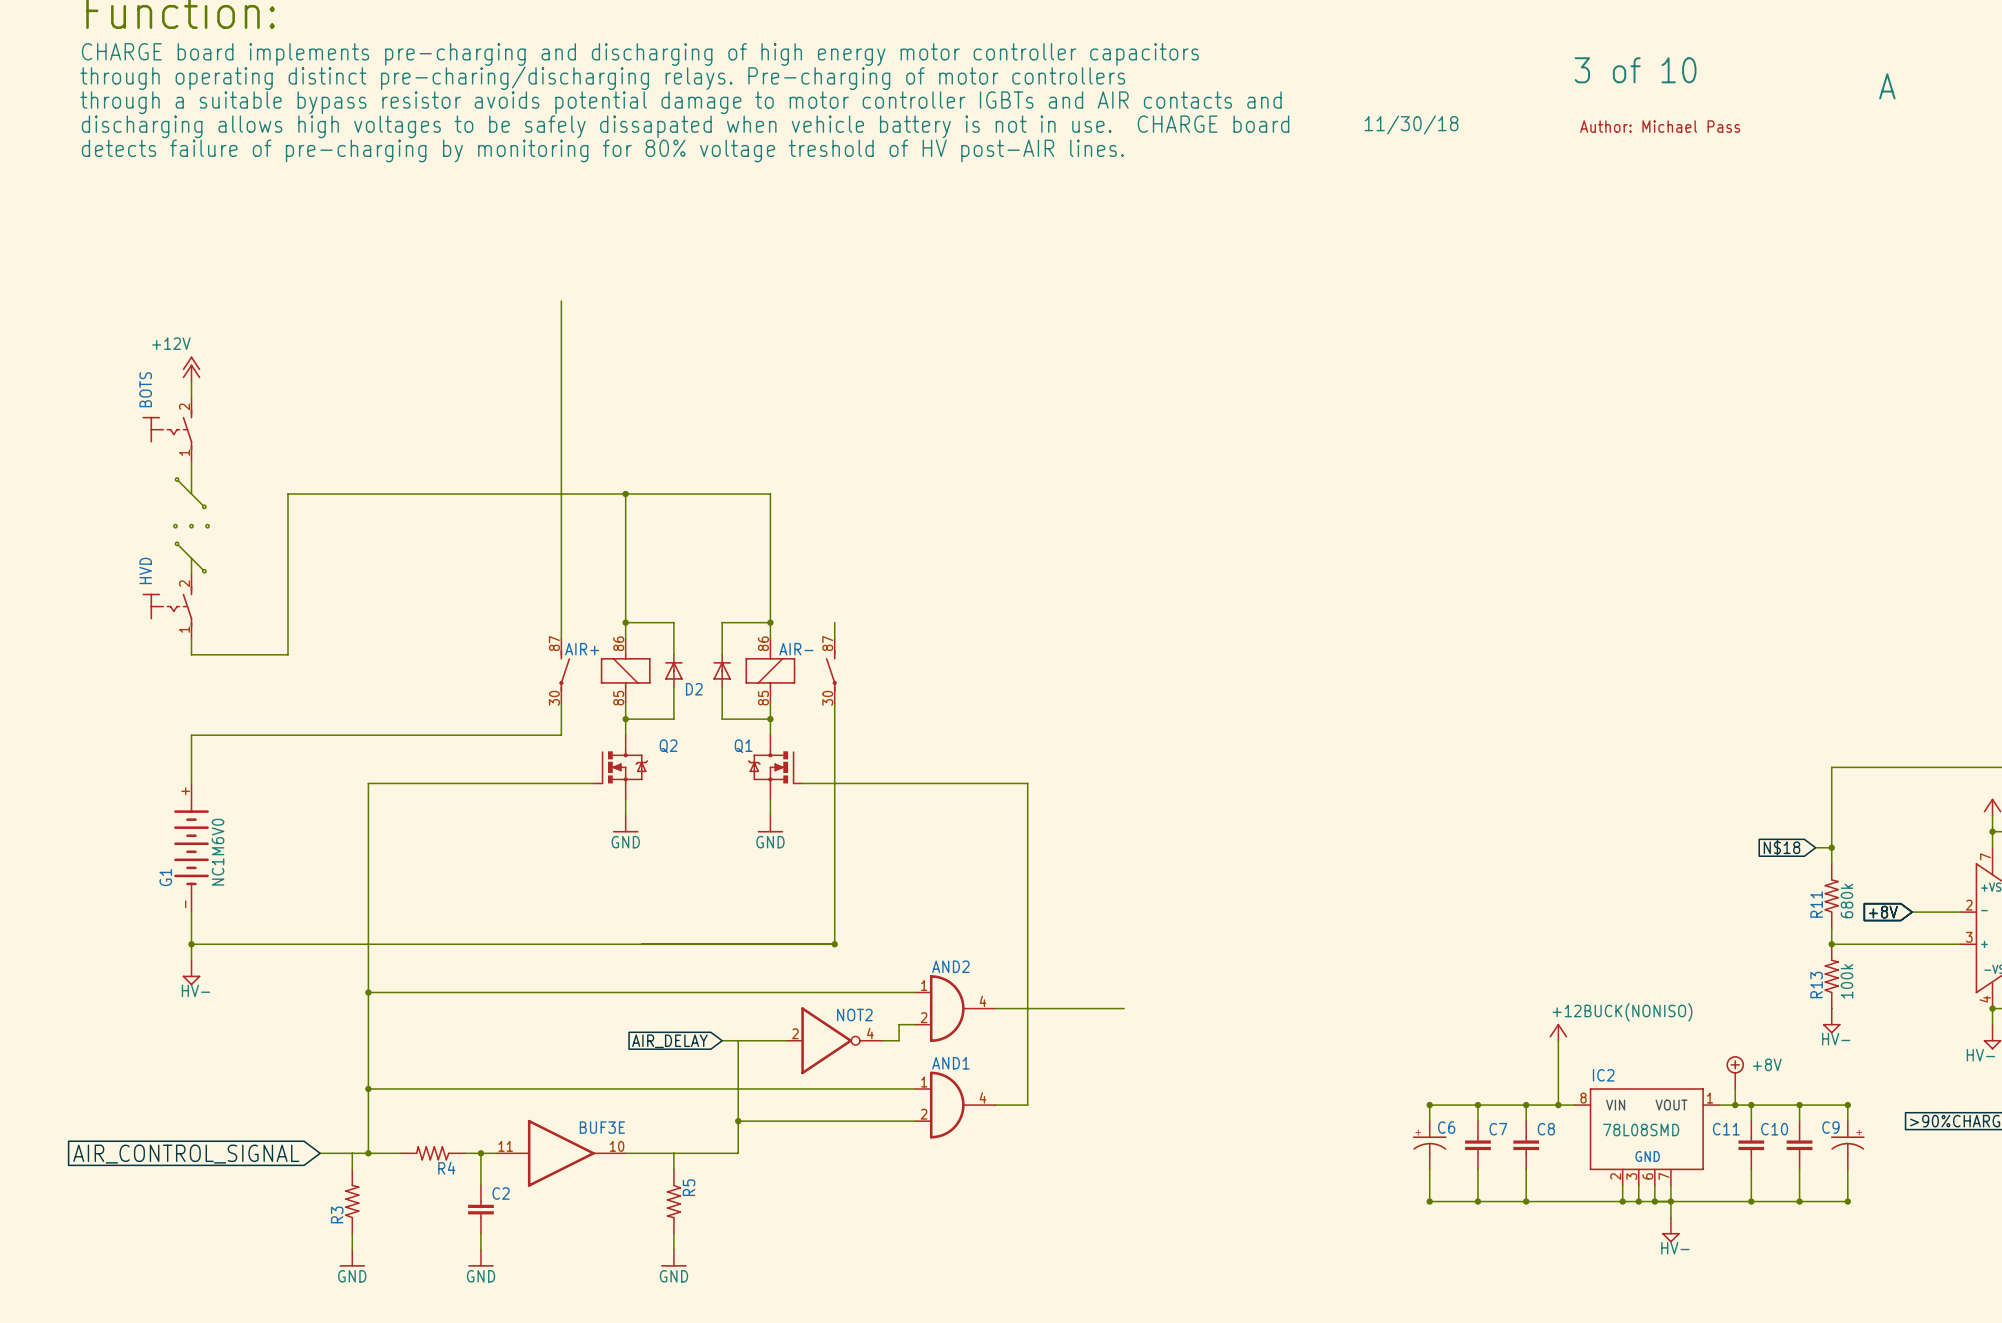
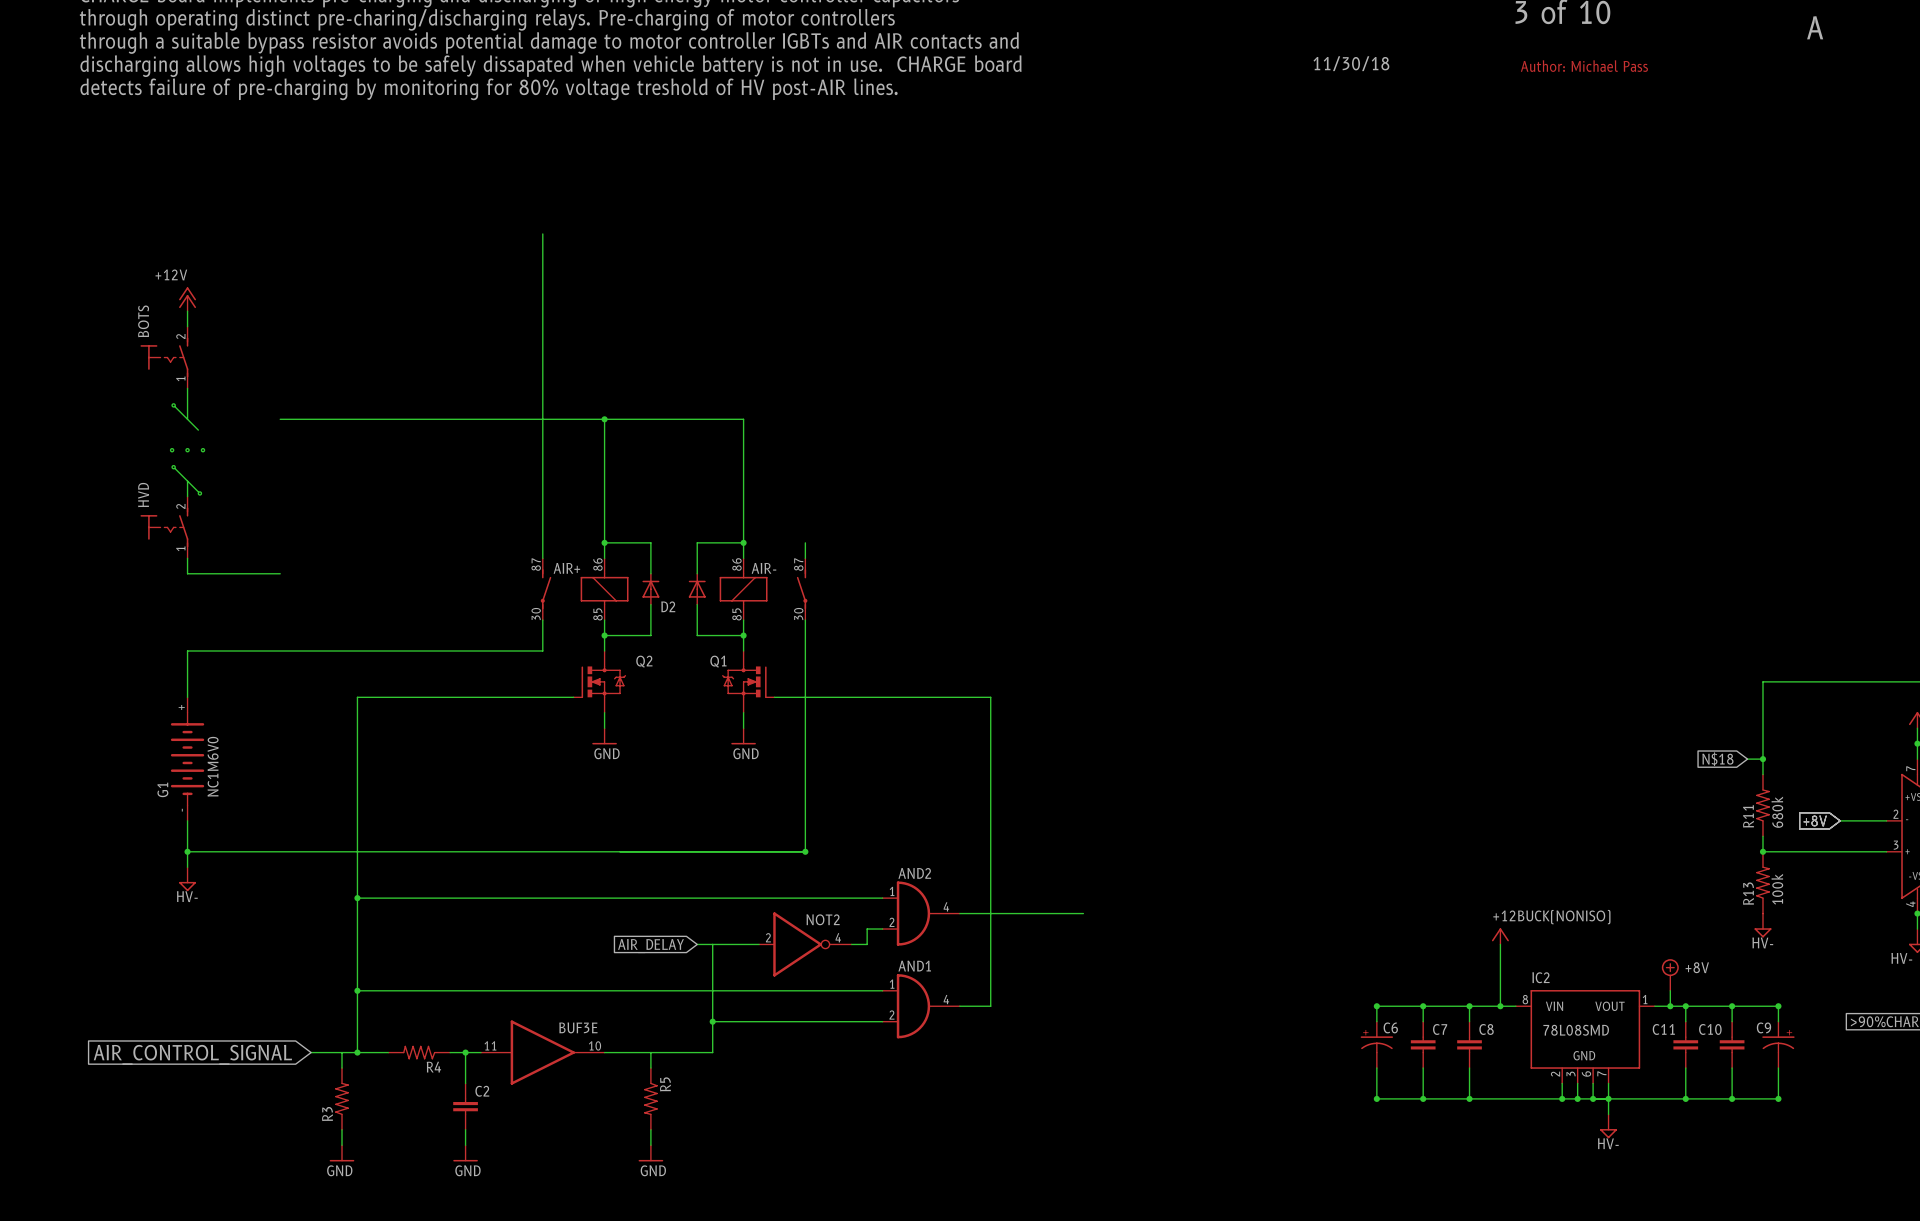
wire: (287, 494) (287, 654) -> none
drawing: [202, 504, 207, 509] -> none

